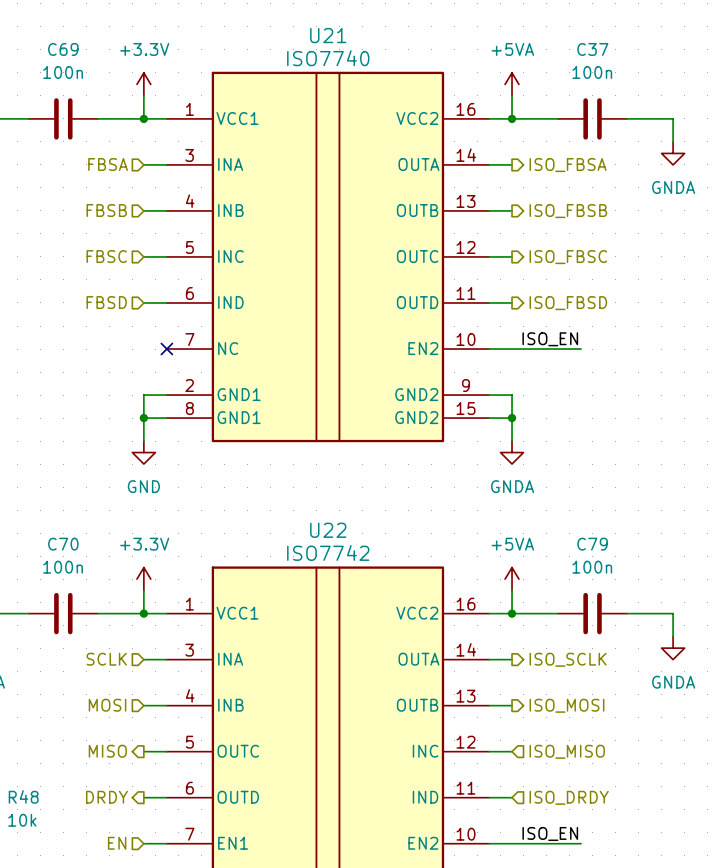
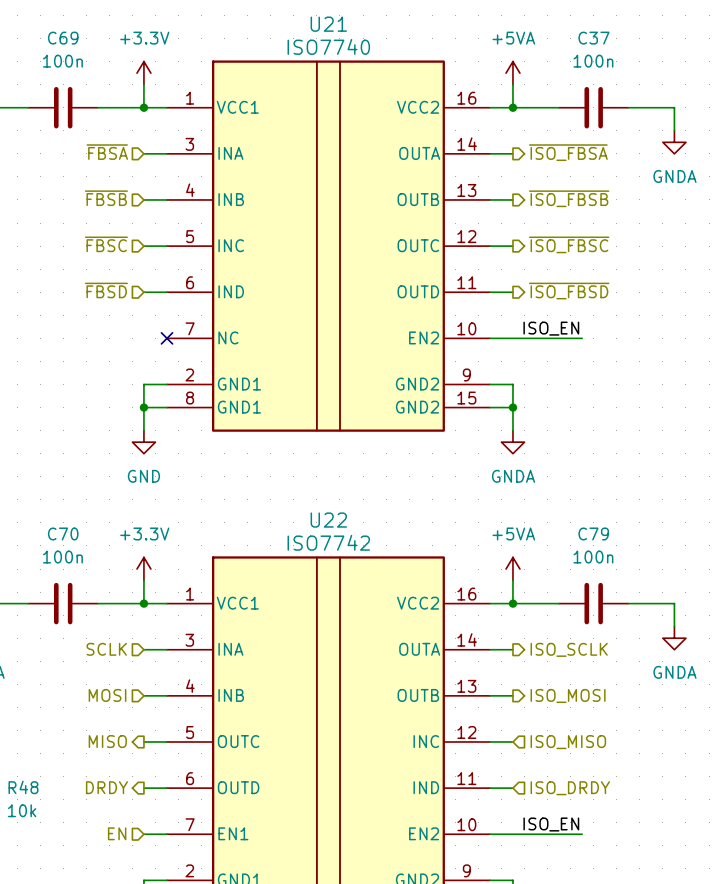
hierarchical label: FBSA (108, 164) -> ~{FBSA} (107, 152)
hierarchical label: ISO_FBSA (568, 165) -> ~{ISO_FBSA} (568, 152)
hierarchical label: FBSB (106, 210) -> ~{FBSB} (106, 198)
hierarchical label: ISO_FBSB (568, 211) -> ~{ISO_FBSB} (569, 198)
hierarchical label: FBSC (106, 256) -> ~{FBSC} (106, 244)
hierarchical label: ISO_FBSC (568, 257) -> ~{ISO_FBSC} (569, 244)
hierarchical label: FBSD (106, 302) -> ~{FBSD} (106, 290)
hierarchical label: ISO_FBSD (568, 303) -> ~{ISO_FBSD} (569, 291)

